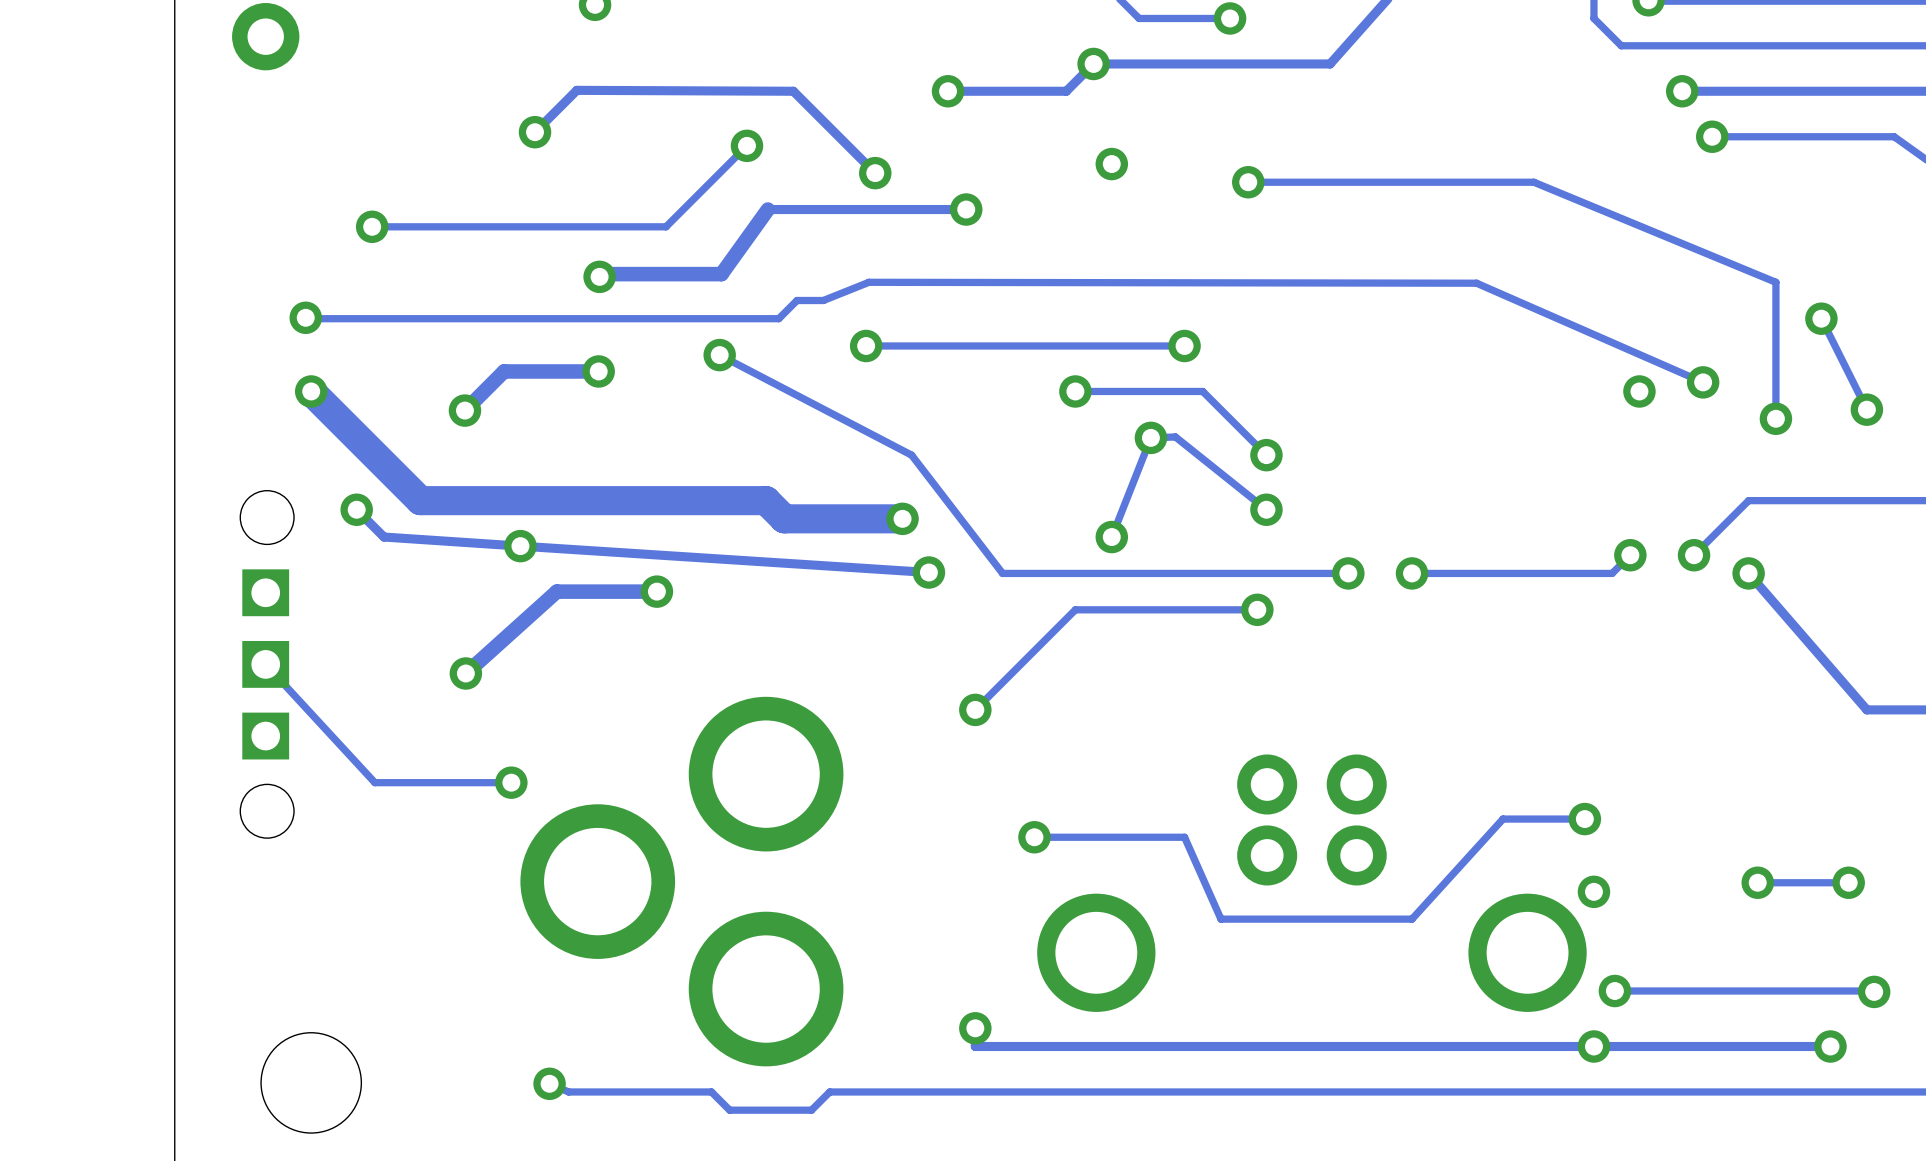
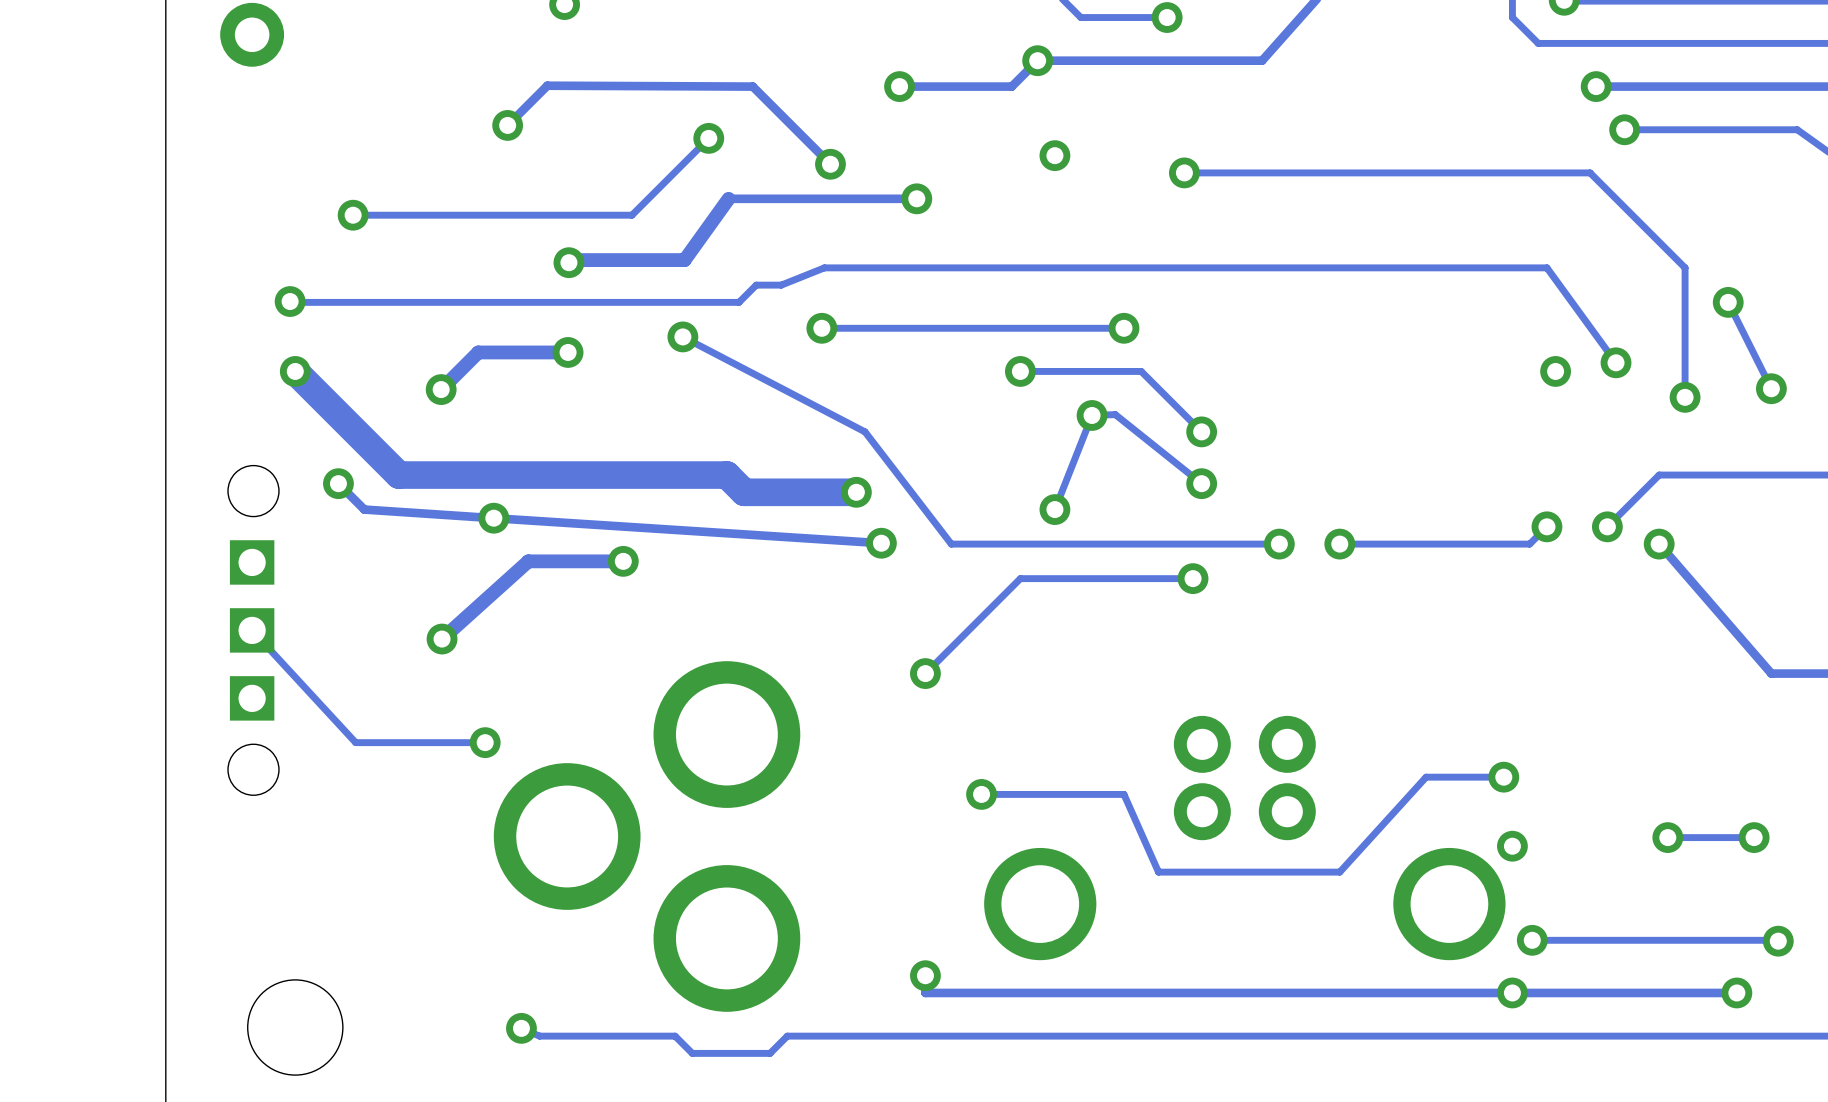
track: (1533, 182) (1775, 282) -> (1455, 172) (1590, 172) (1685, 267)
track: (868, 282) (1476, 283) (1703, 382) -> (824, 267) (1546, 267) (1616, 362)

